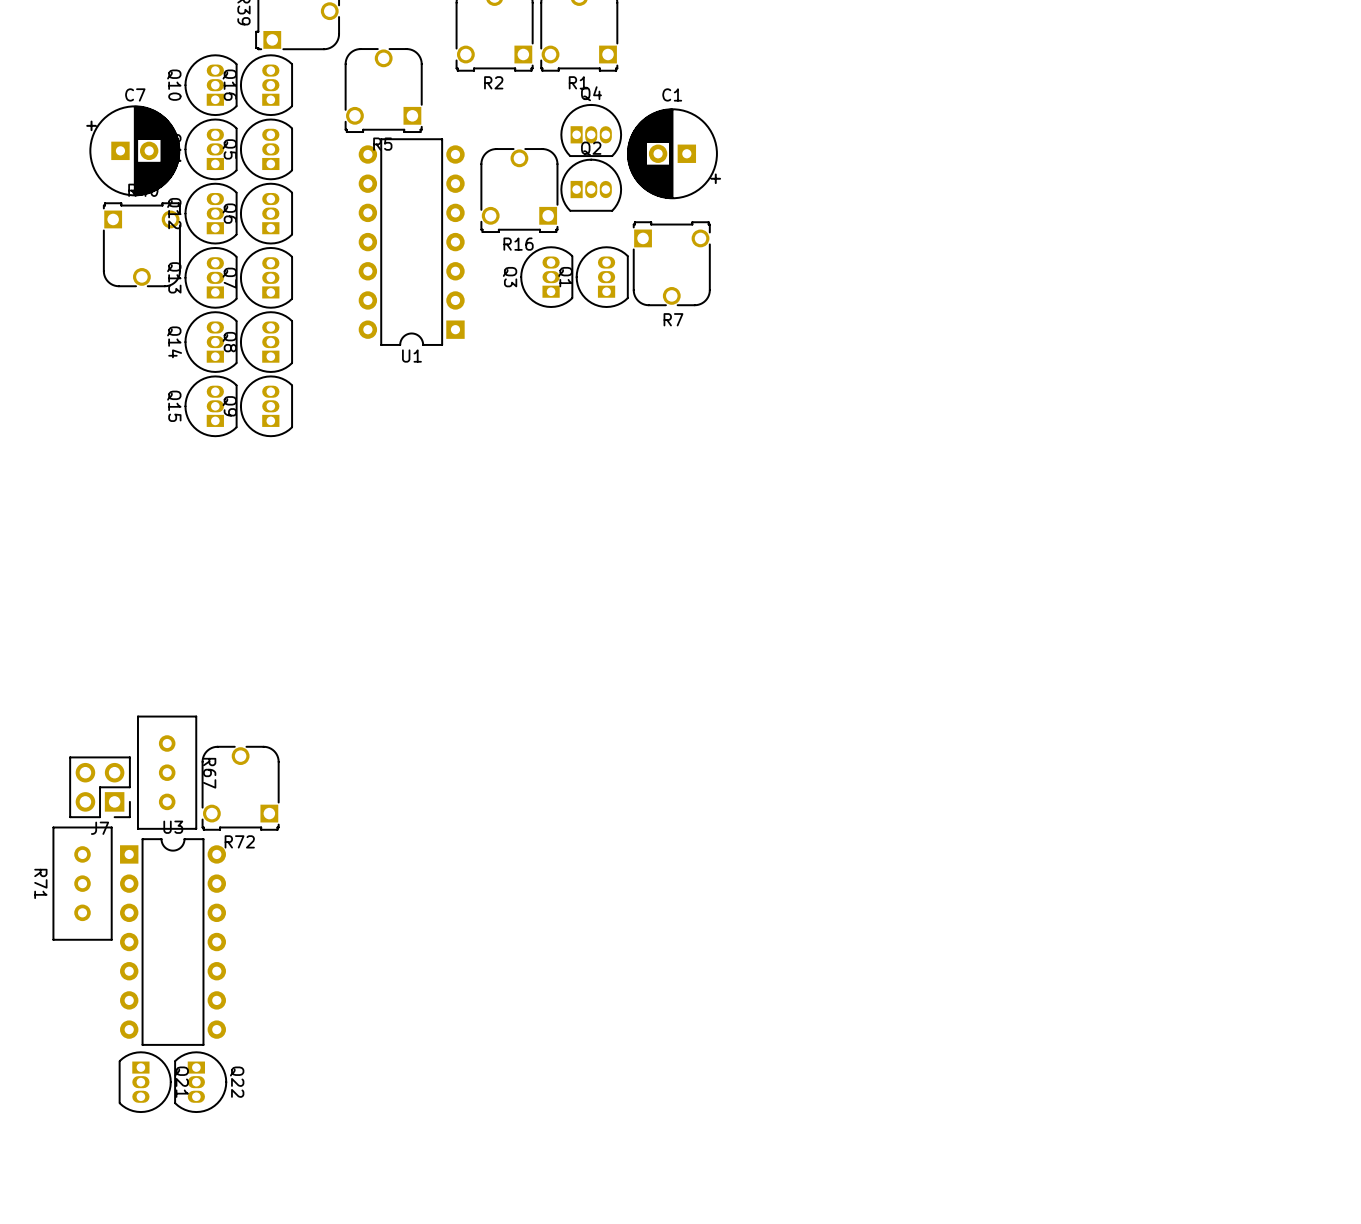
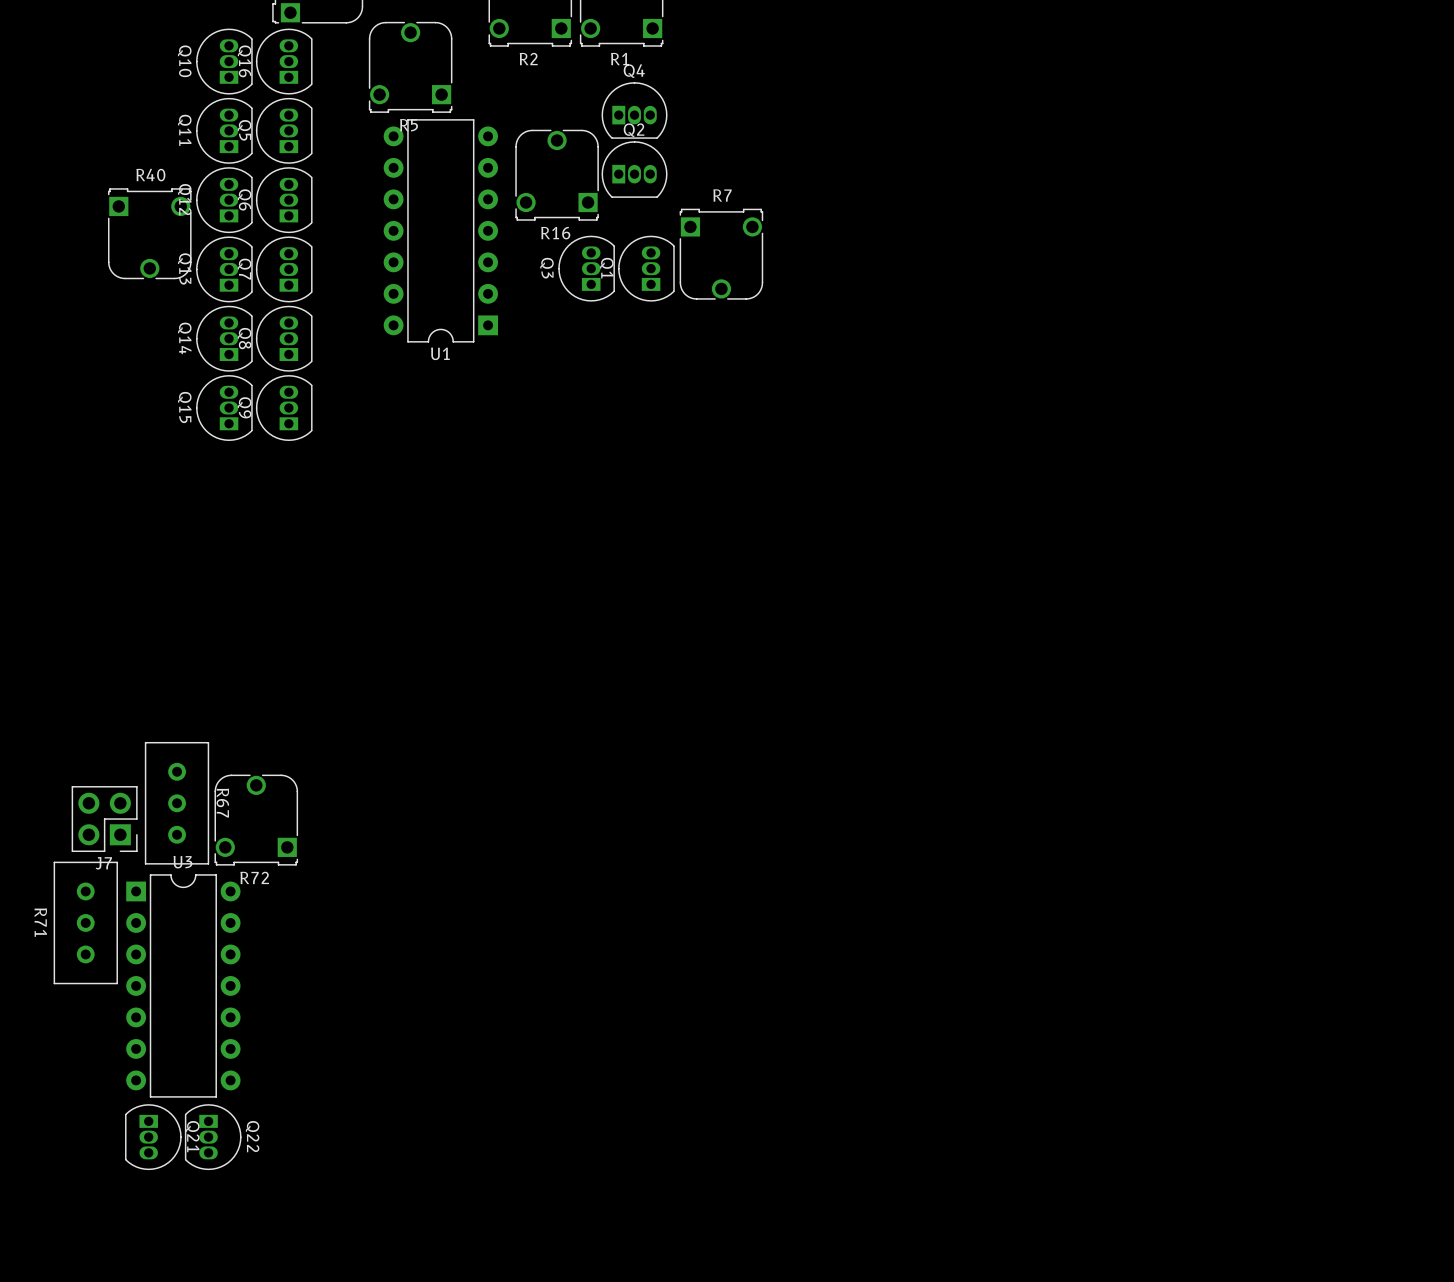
C7: (133, 150) -> none
C1: (674, 153) -> none
R7 name position: R7 (673, 319) -> R7 (722, 195)

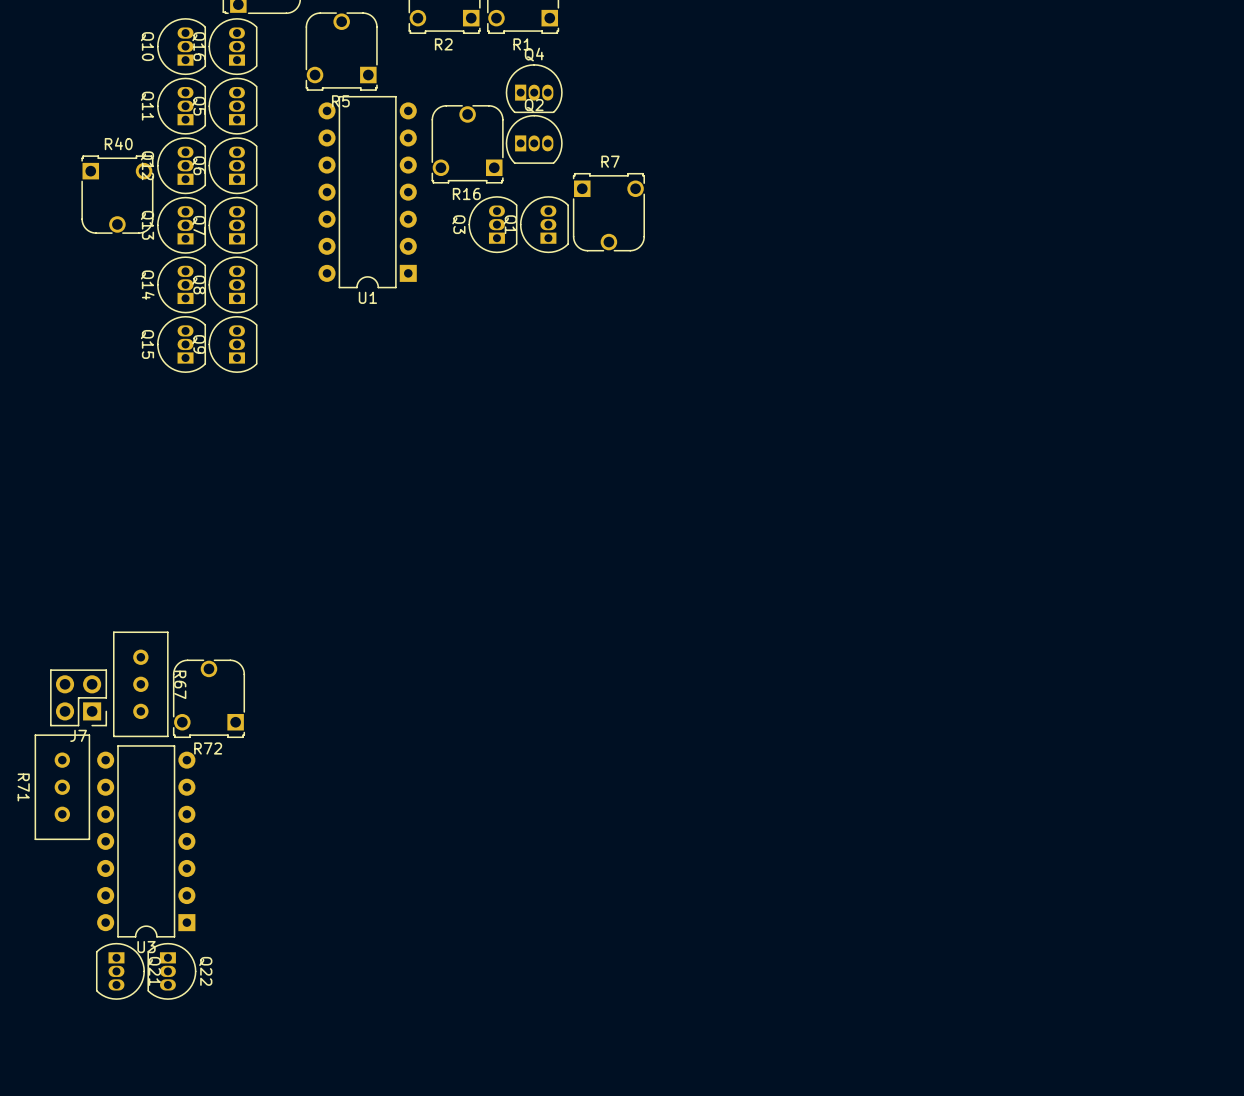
U3 rotation: 0° (183, 985) -> 180° (146, 841)

